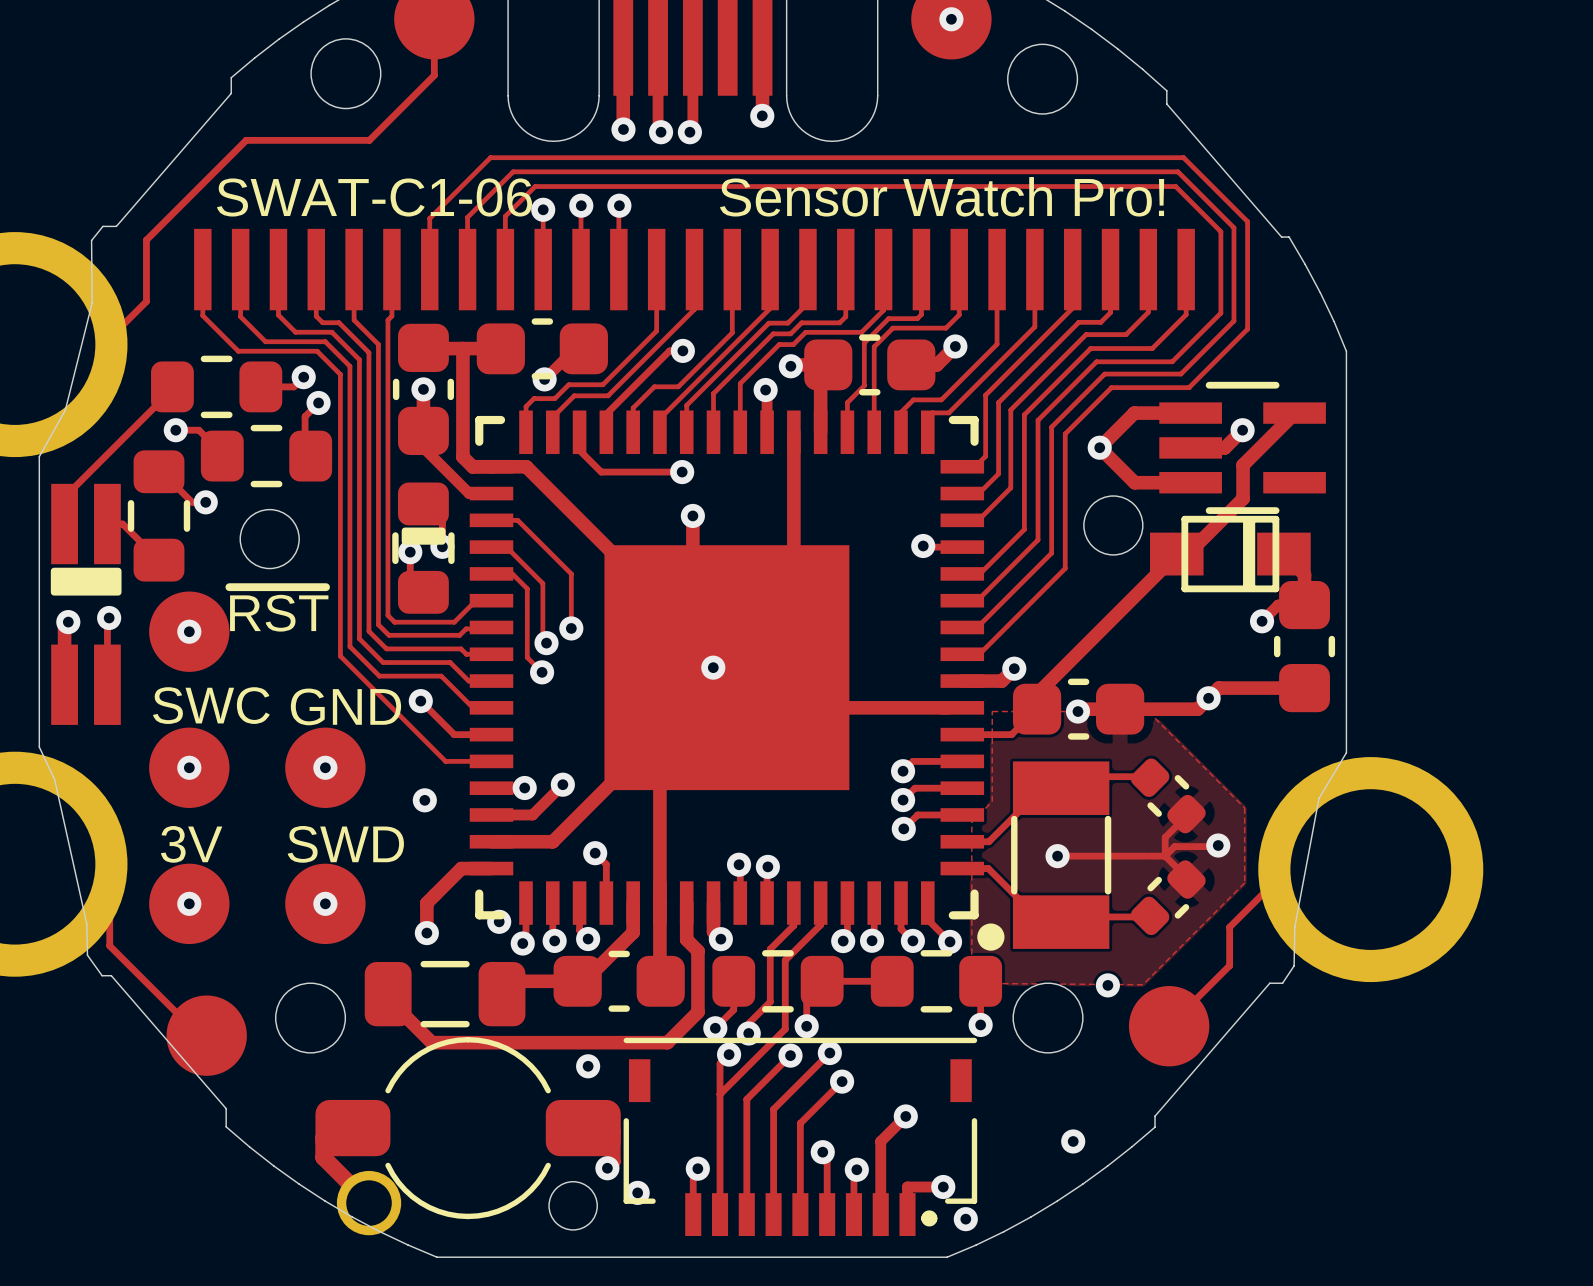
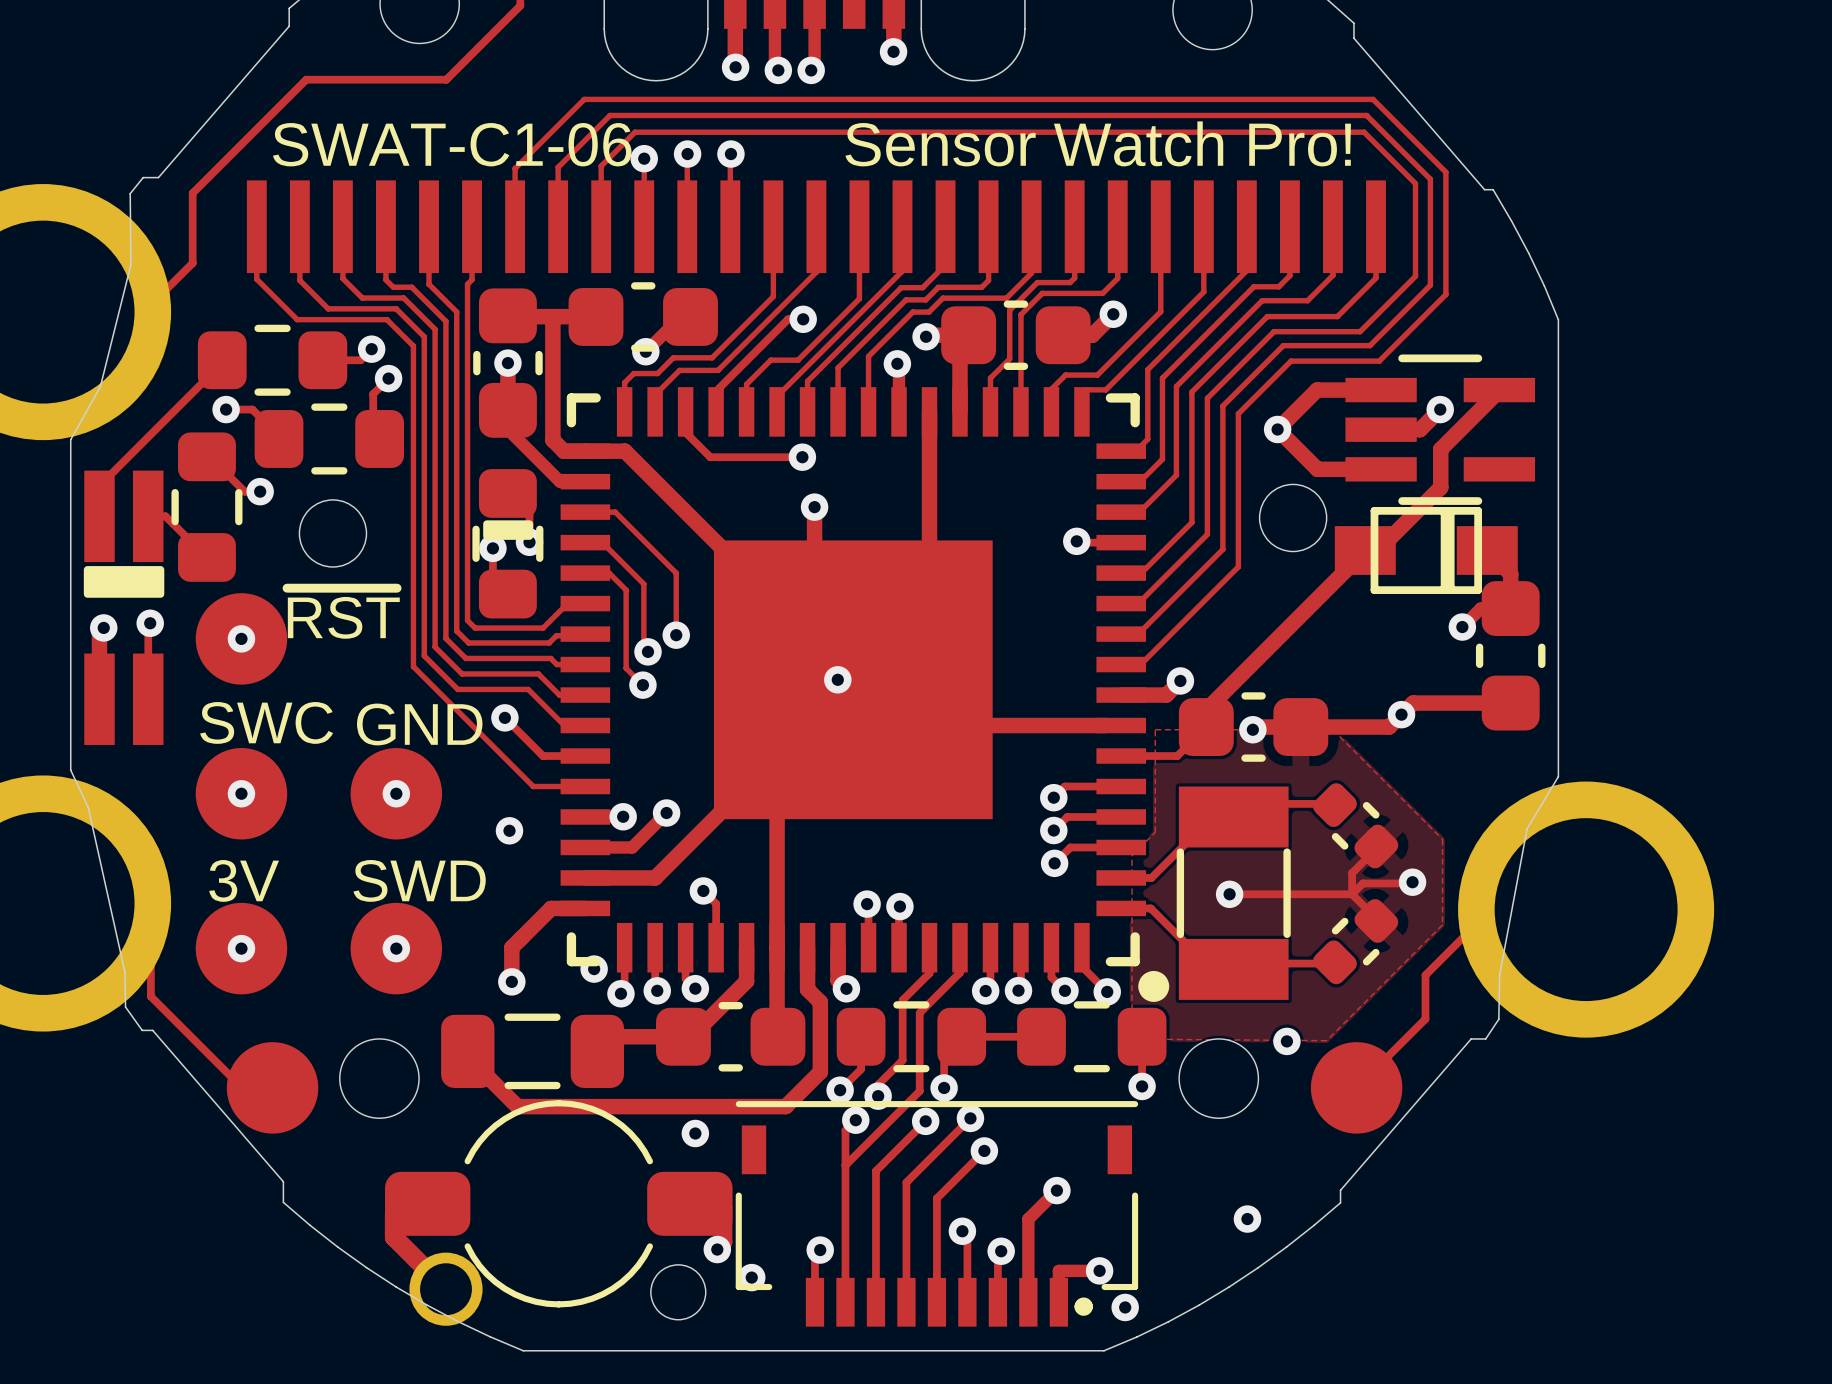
part position: (206, 1035) -> (272, 1087)

